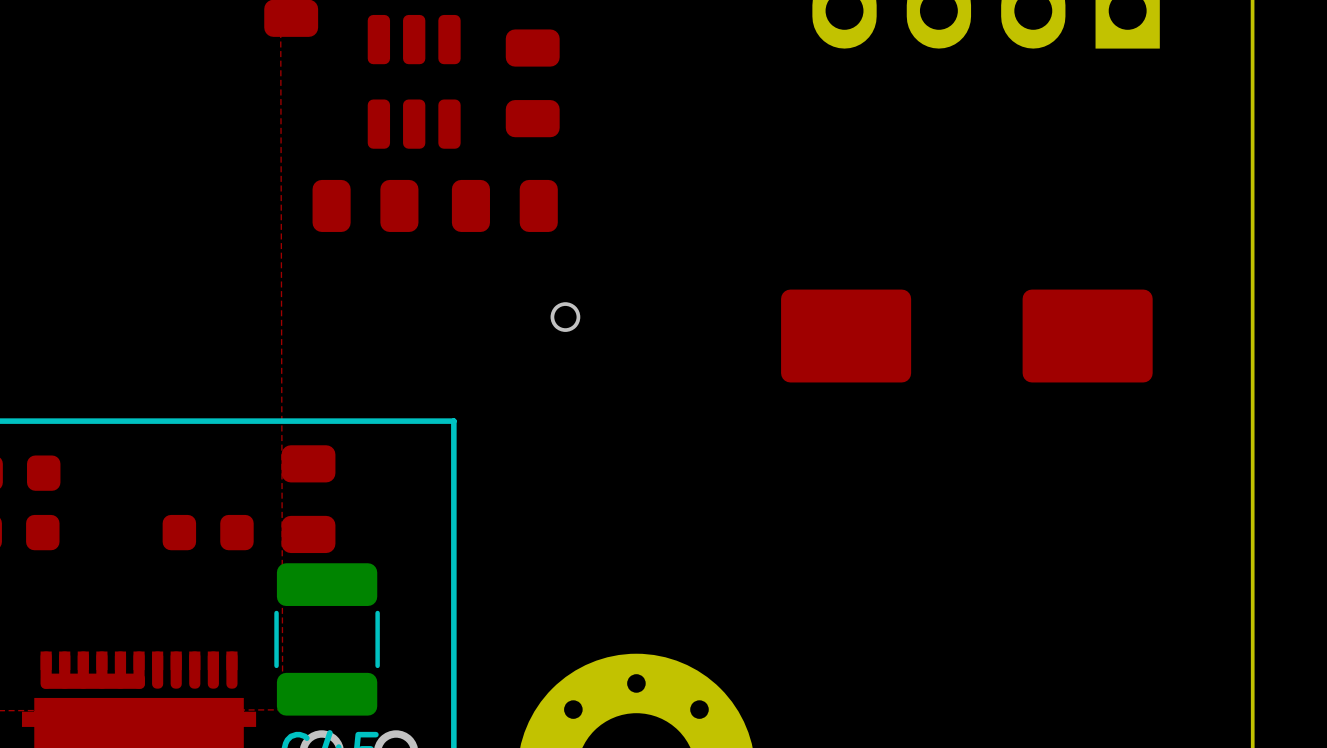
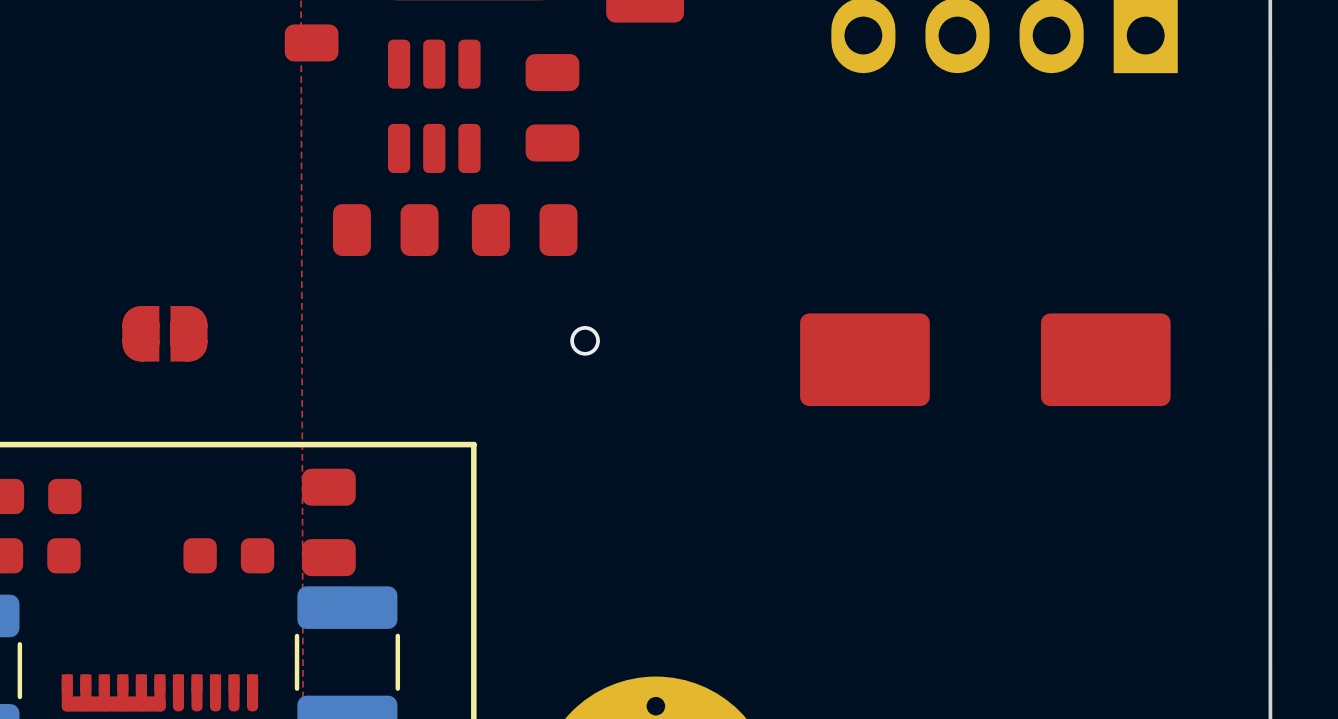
part: none -> (164, 333)

